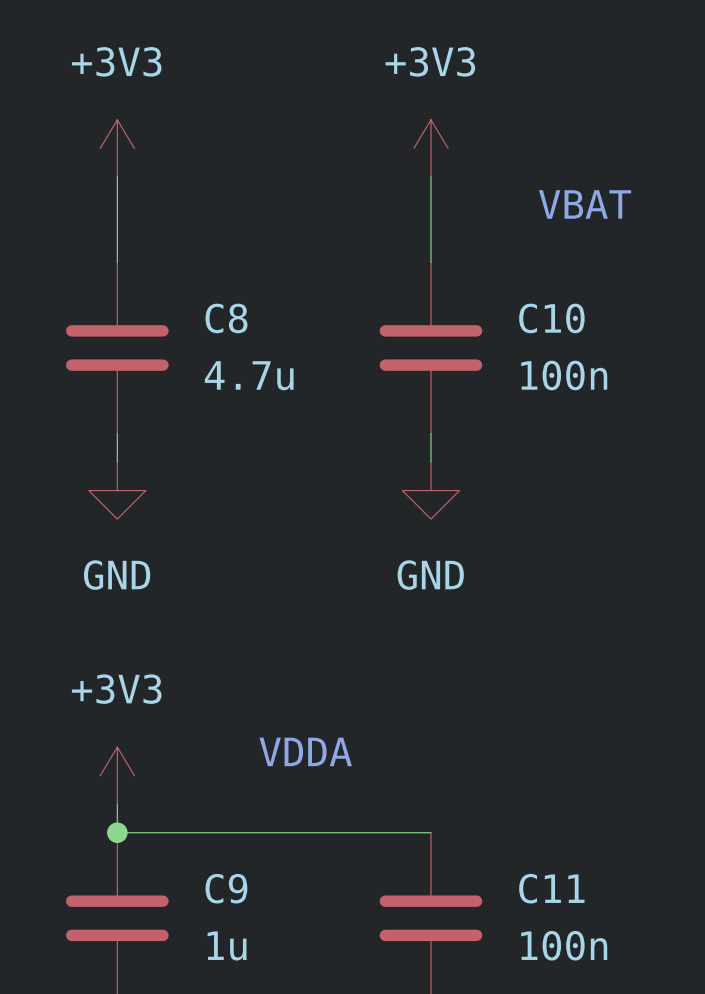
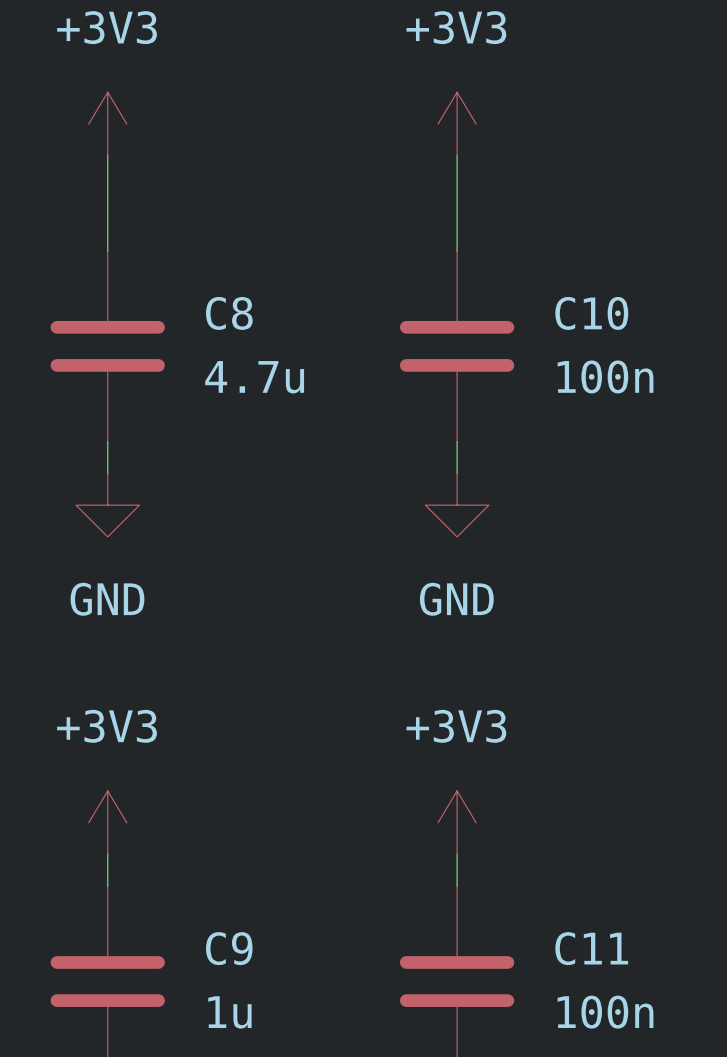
text: VBAT (585, 204) -> none
text: VDDA (305, 751) -> none
power symbol: none -> +3V3 (457, 822)
wire: (117, 832) (430, 832) -> (457, 854) (457, 886)
junction: (117, 832) -> none

